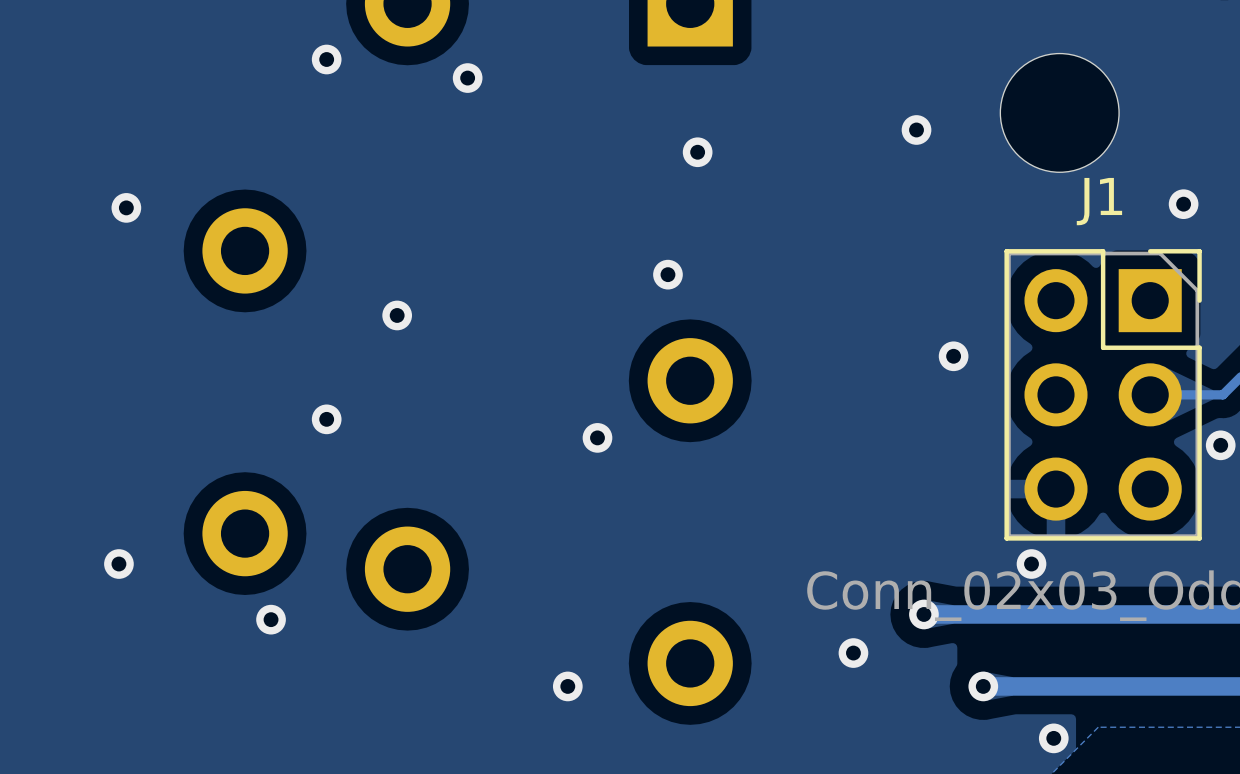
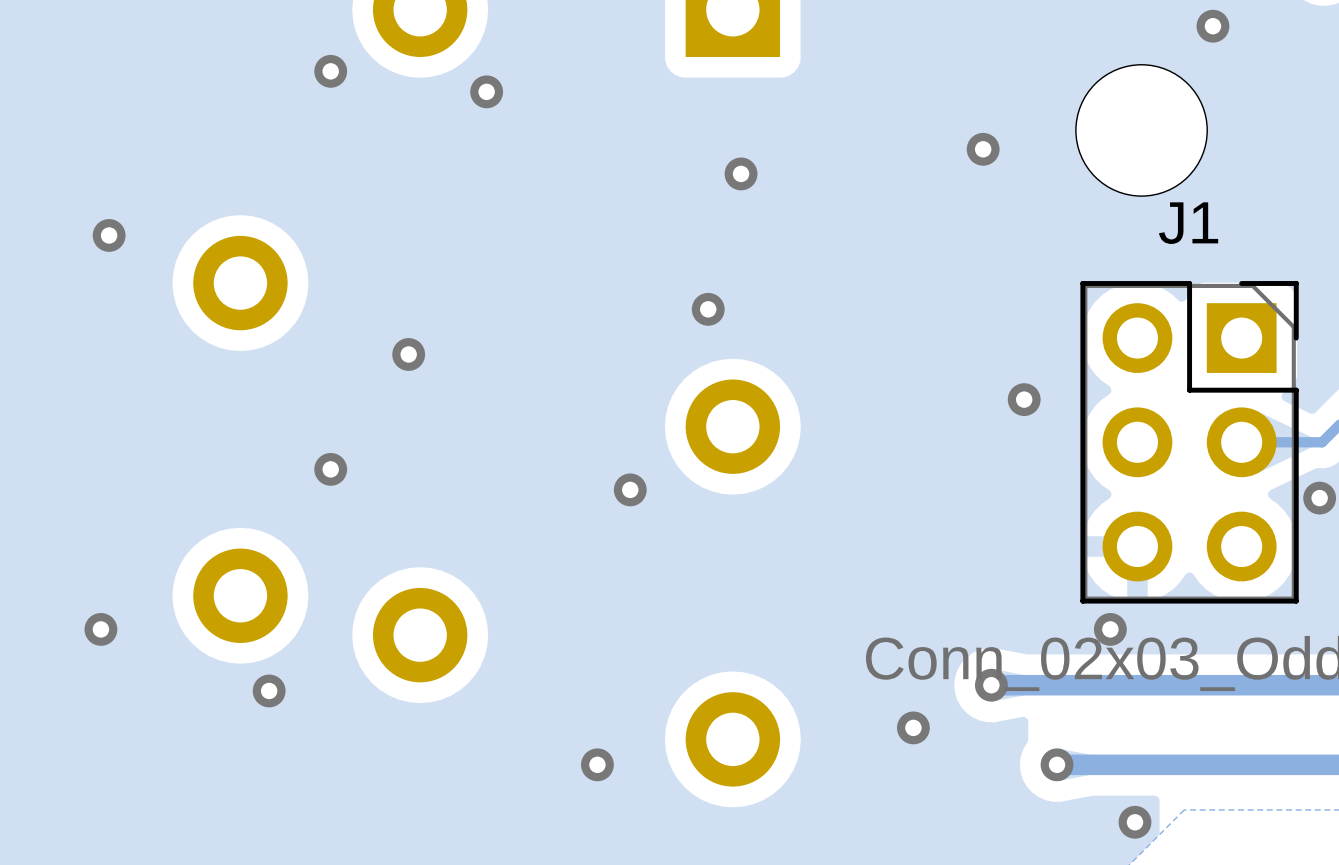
via: none -> (1212, 26)
via: (1183, 204) -> none

